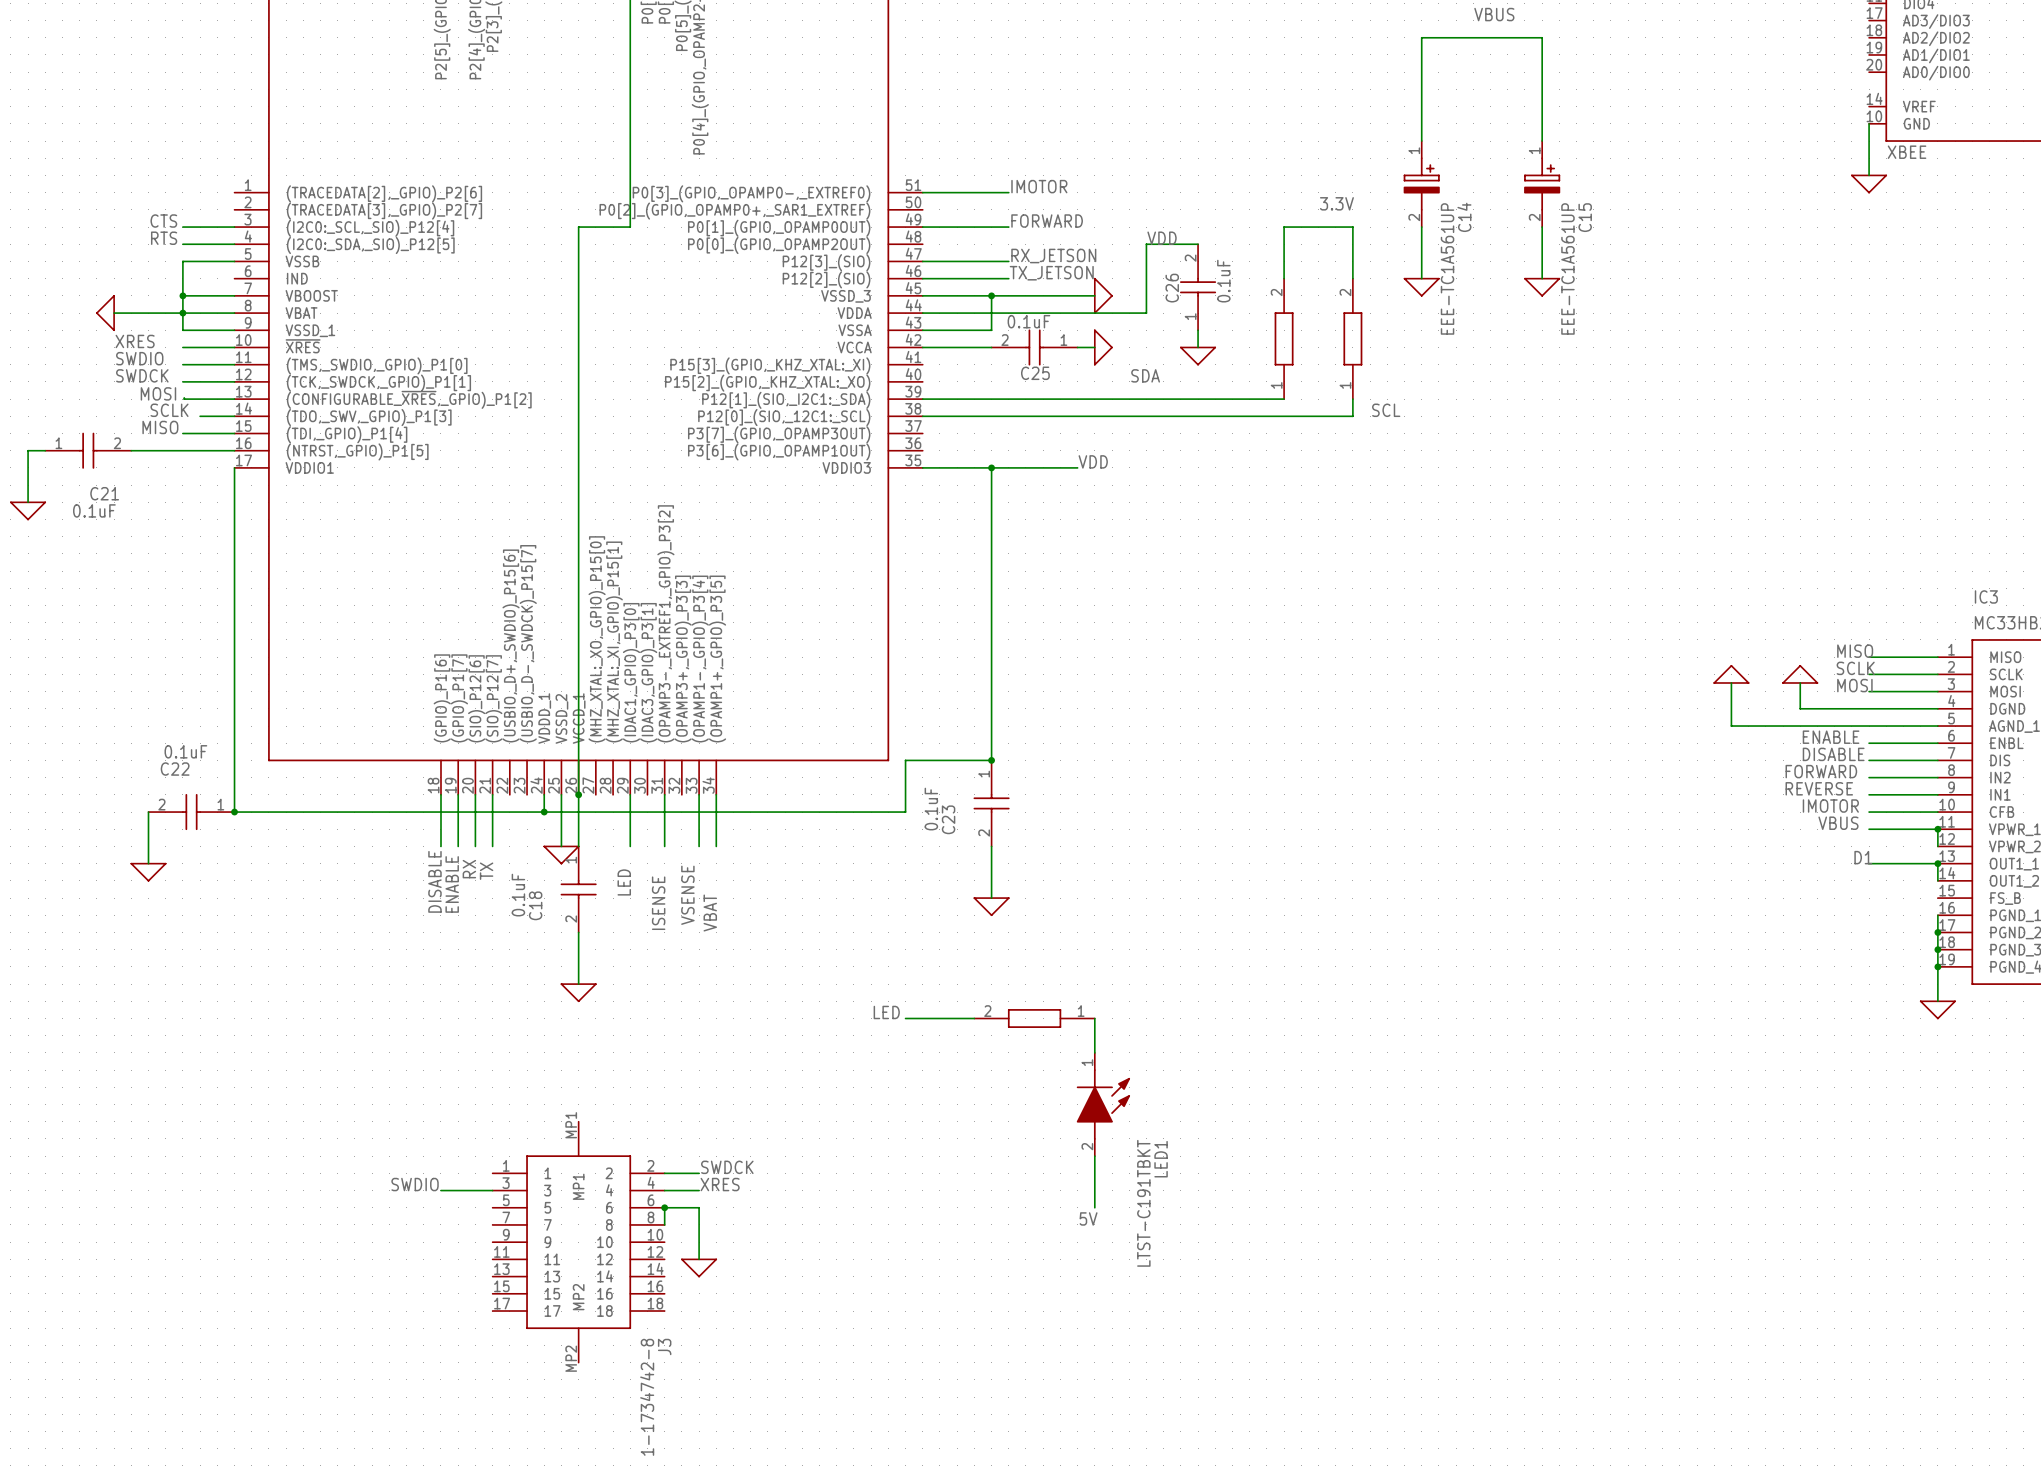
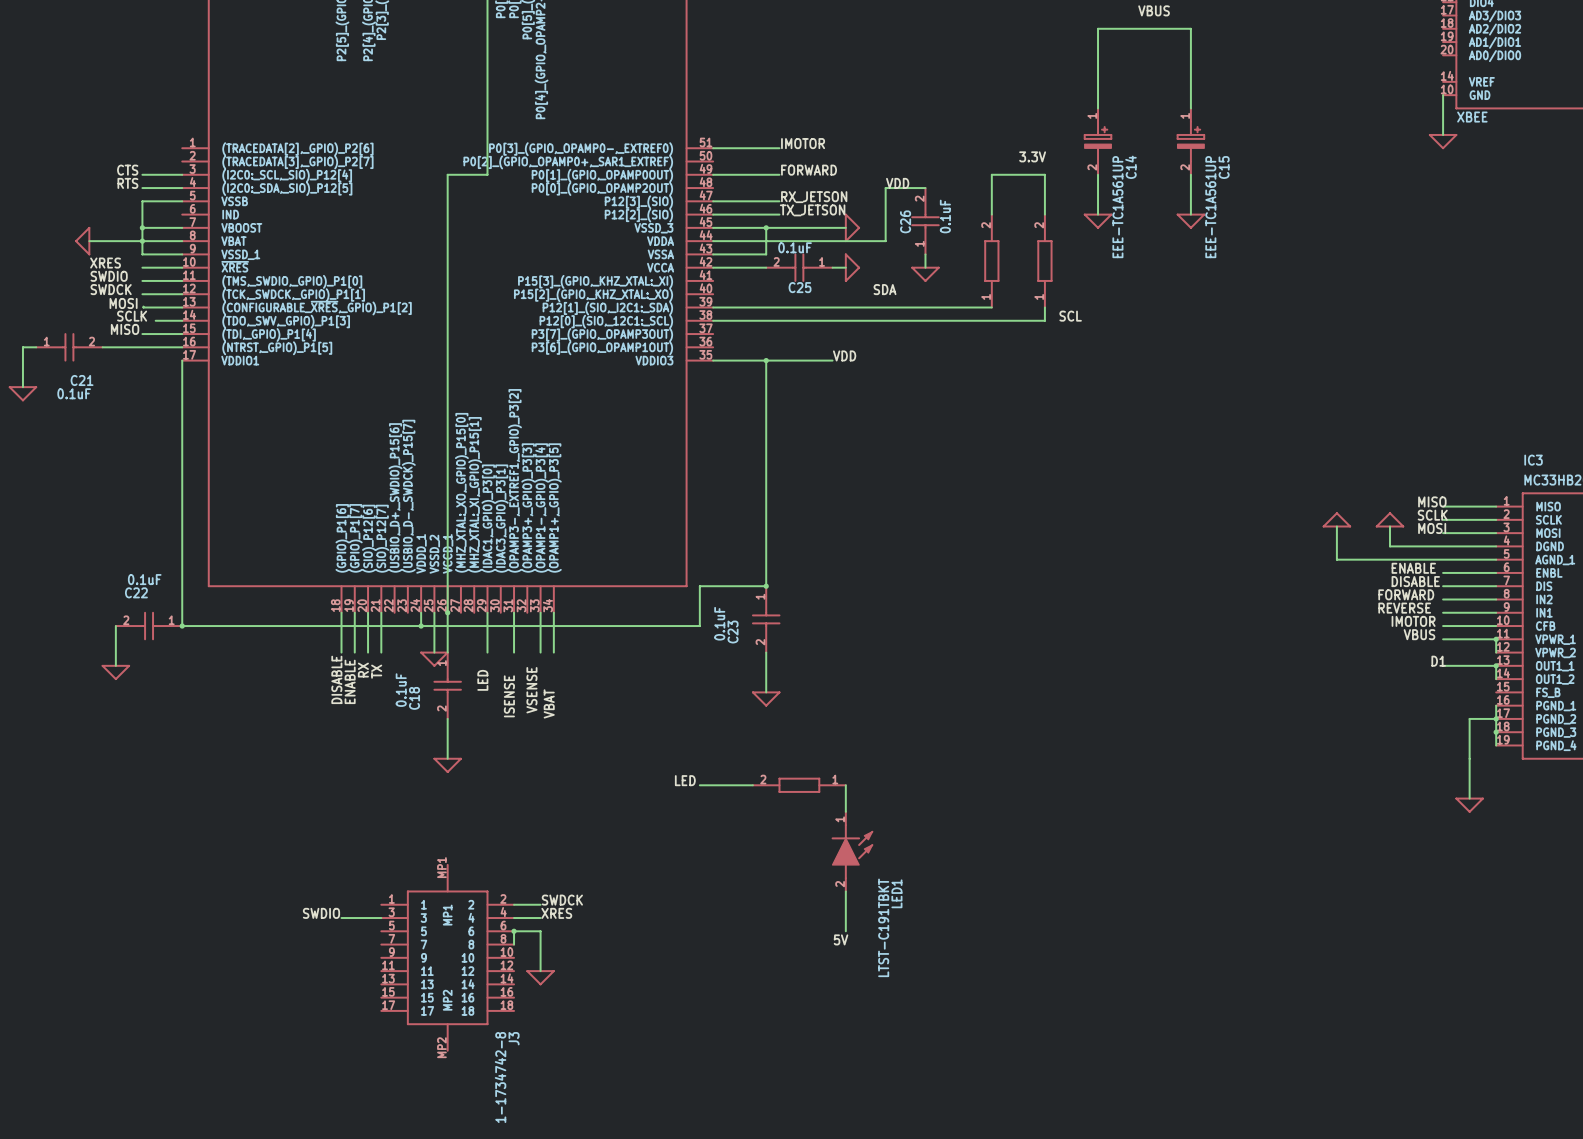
wire: none -> (1496, 718) (1469, 718) (1469, 798)
wire: (1937, 966) (1937, 1001) -> none
junction: (1937, 966) -> none
power symbol position: (1937, 1009) -> (1469, 805)

